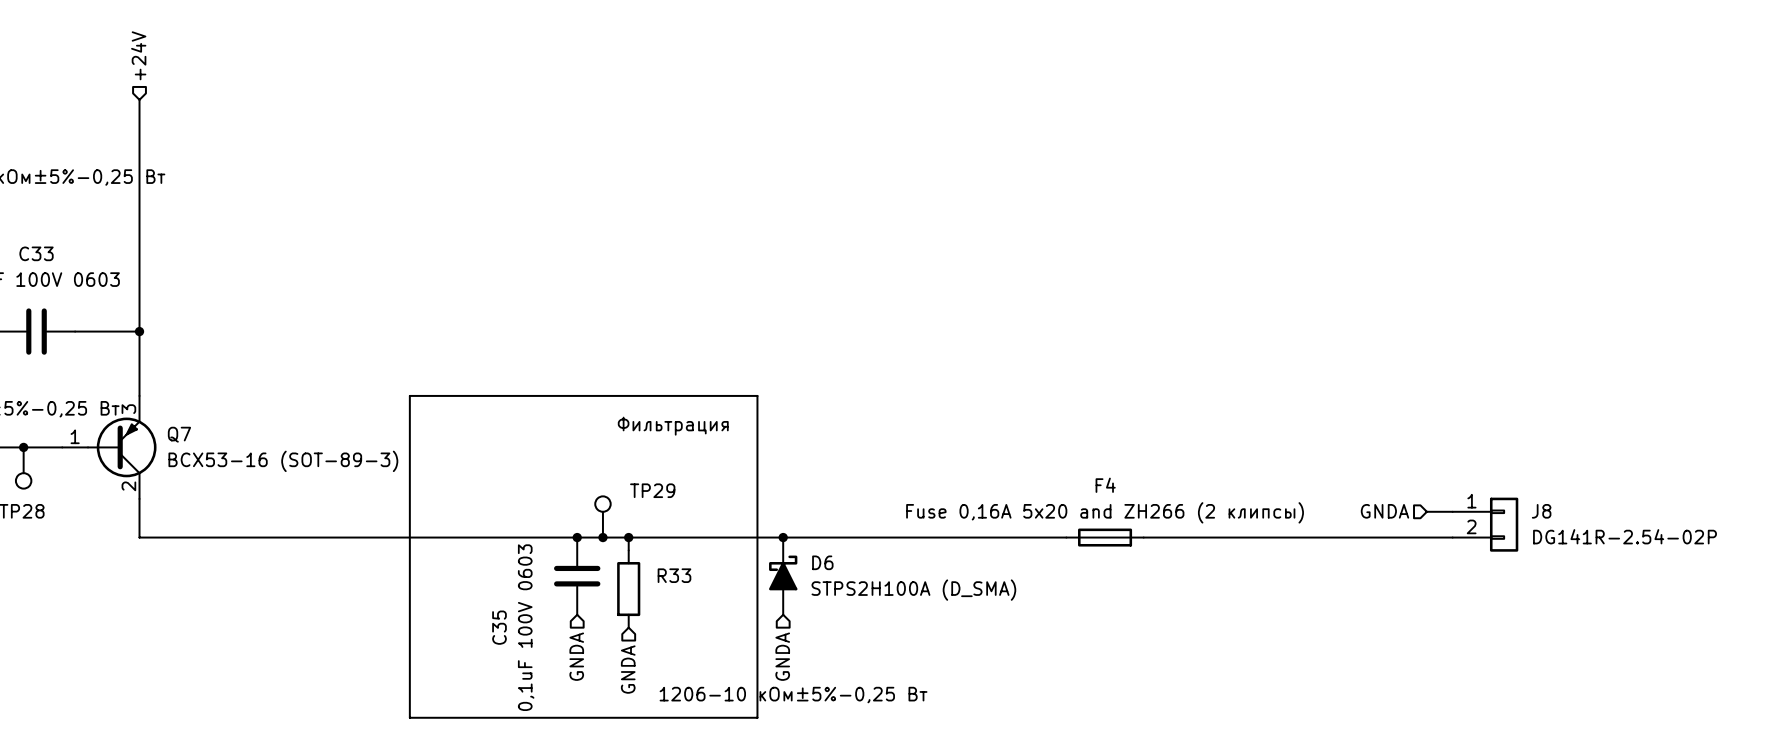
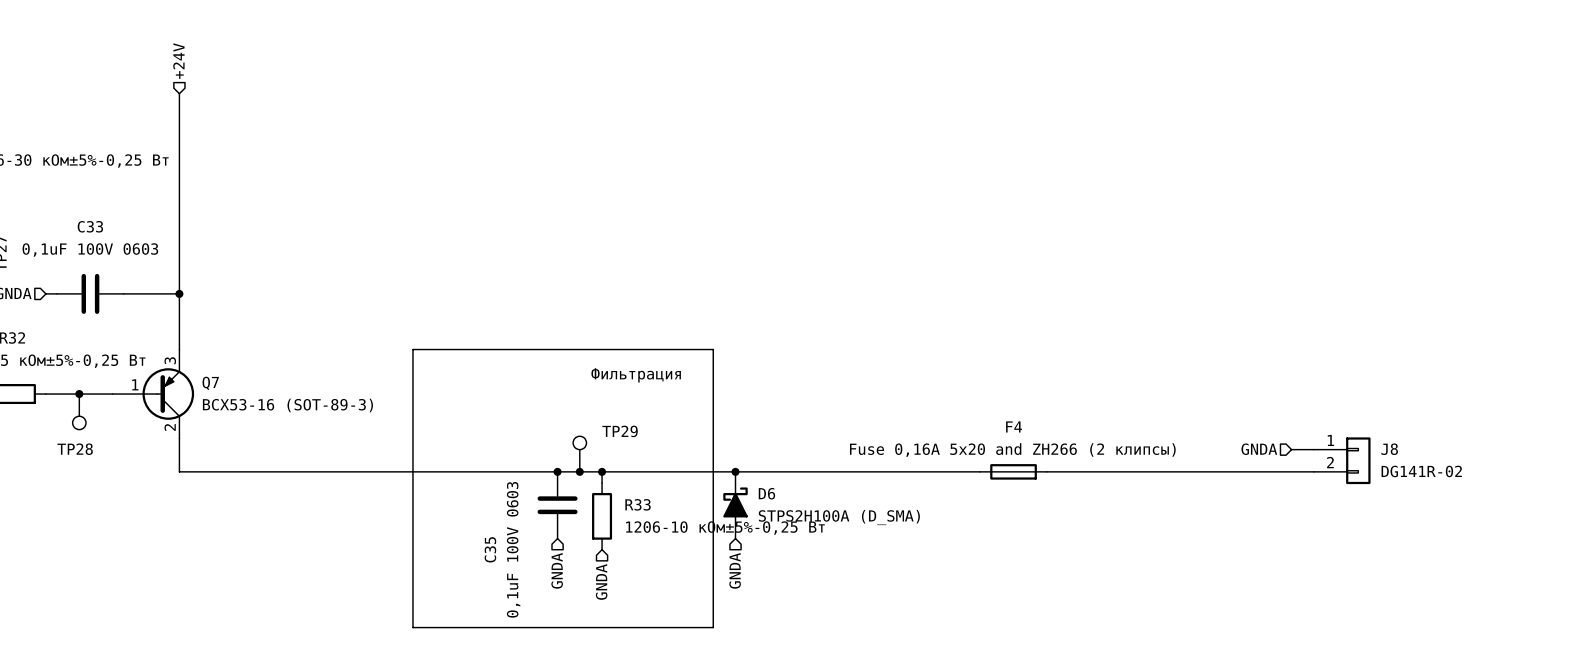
Q7 symbol: [62, 395, 157, 499] -> [112, 349, 195, 439]
J8 value: DG141R-2.54-02P (1624, 536) -> DG141R-02 (1421, 471)
R33 value position: 1206-10 кОм±5%-0,25 Вт (793, 695) -> 1206-10 кОм±5%-0,25 Вт (725, 528)

